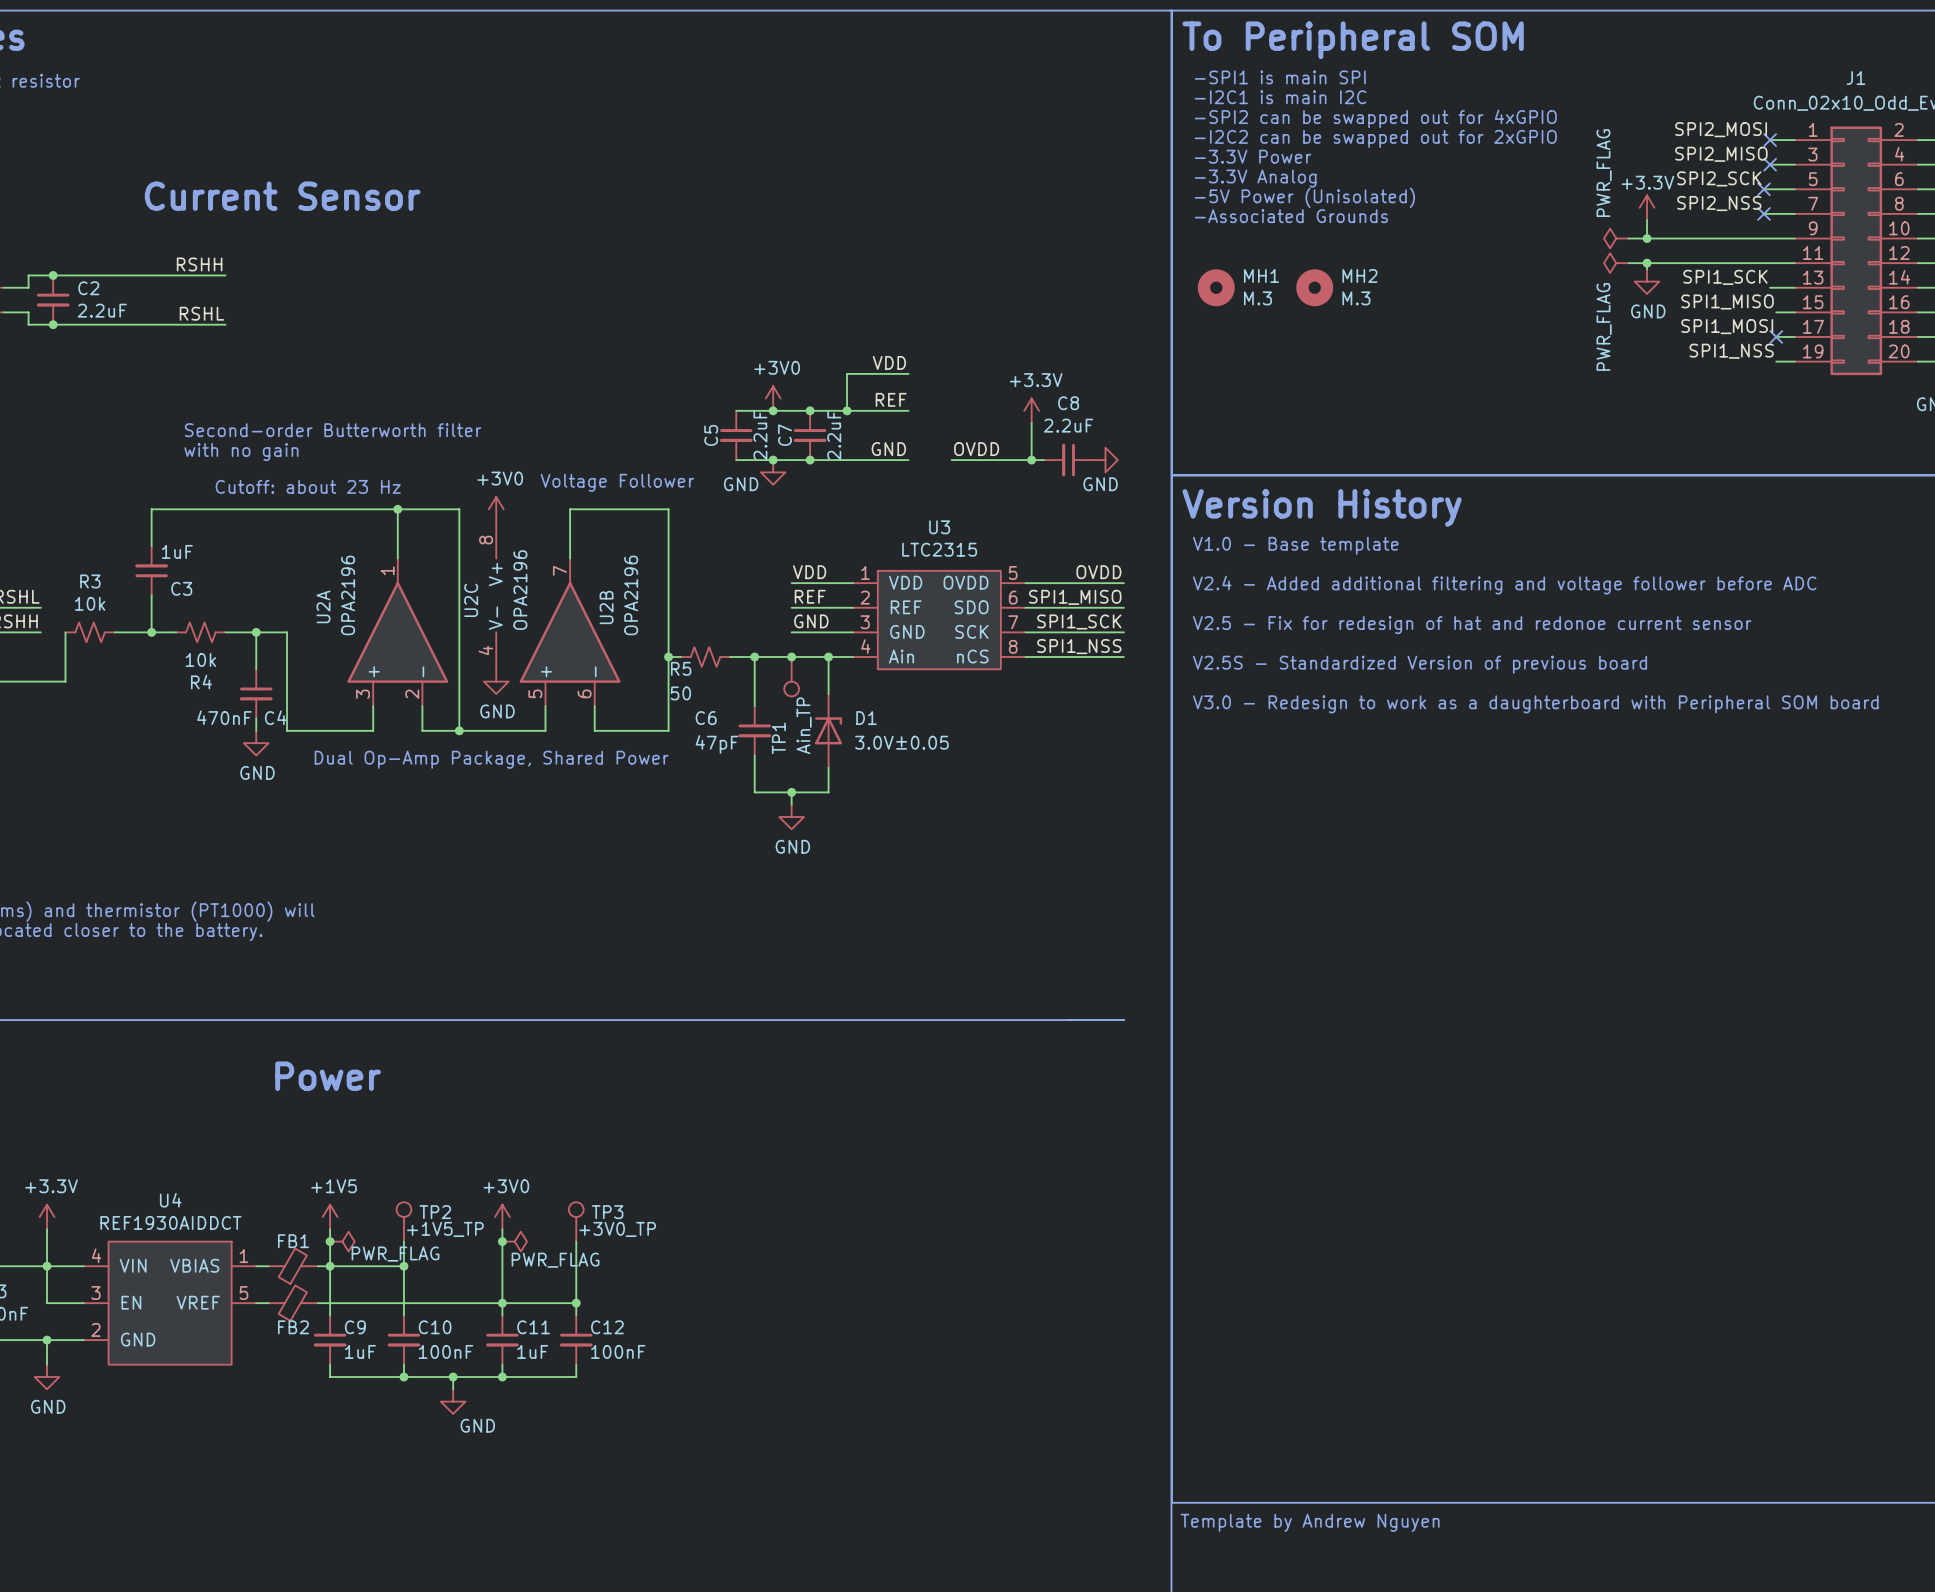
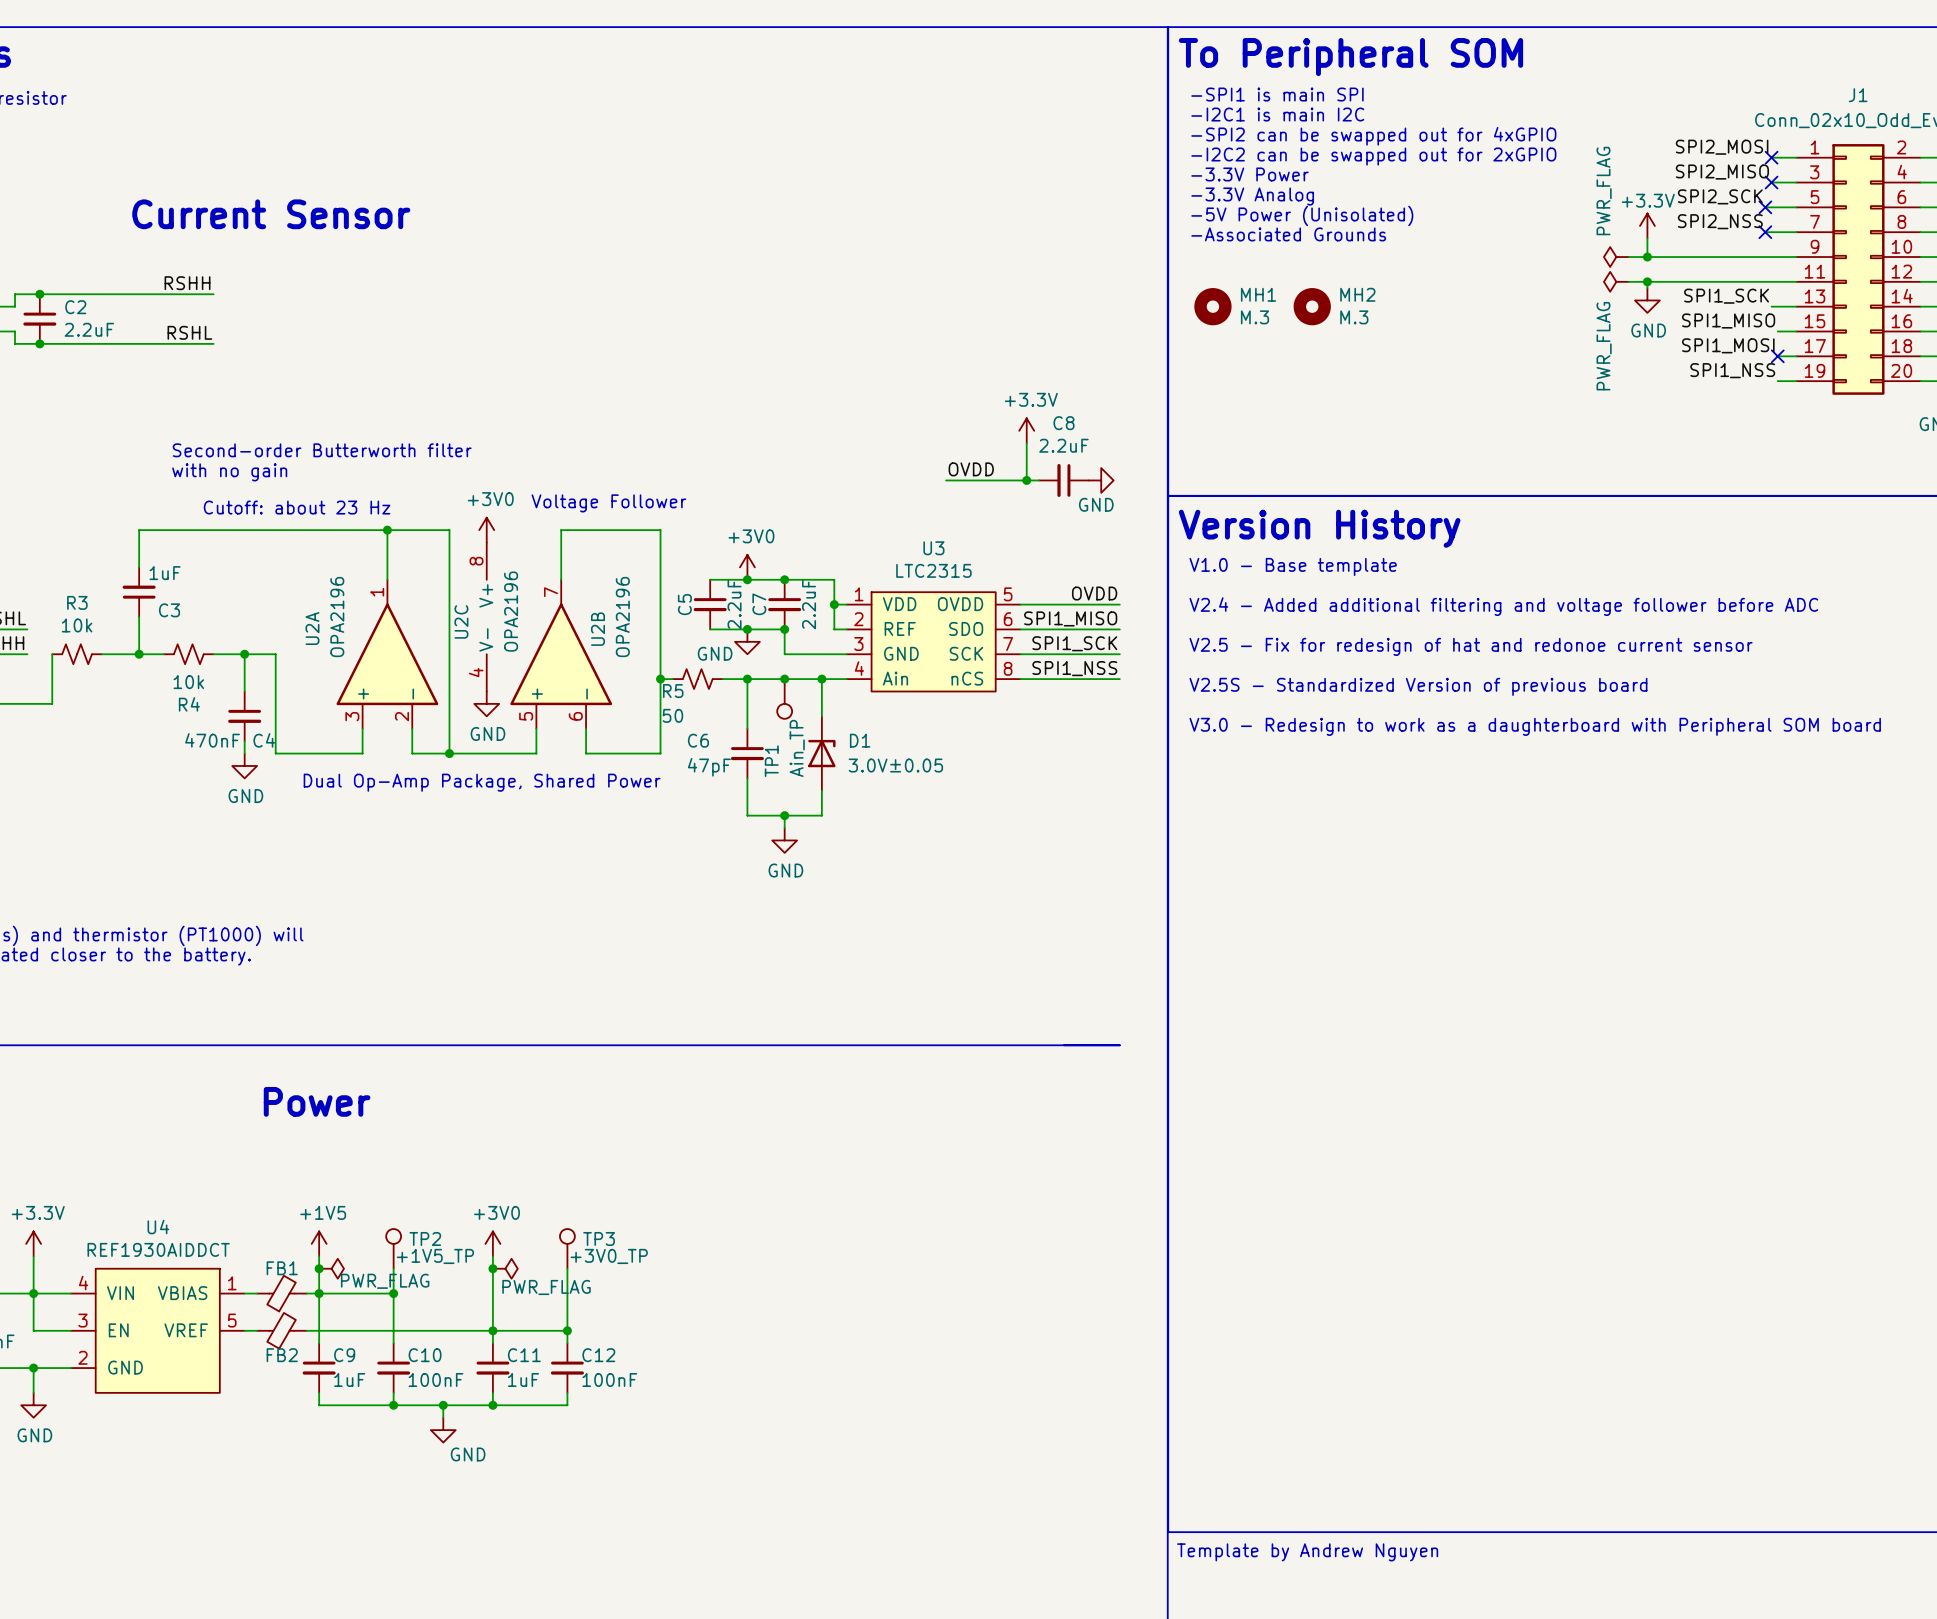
label: VDD (889, 362) -> none
wire: (908, 373) (847, 373) (847, 410) -> none
power symbol position: +3V0 (773, 398) -> +3V0 (747, 567)
label: REF (891, 399) -> none
wire: (736, 410) (908, 410) -> none
junction: (773, 410) -> none
junction: (810, 410) -> none
junction: (847, 410) -> none
C5 position: (736, 435) -> (710, 604)
C7 position: (810, 435) -> (784, 604)
label: GND (888, 449) -> none
wire: (736, 460) (908, 460) -> none
junction: (773, 460) -> none
junction: (810, 460) -> none
power symbol position: GND (773, 472) -> GND (747, 641)
junction: none -> (747, 579)
junction: none -> (784, 579)
label: VDD (809, 572) -> none
wire: (791, 583) (840, 583) -> none
junction: none -> (834, 604)
label: REF (810, 596) -> none
wire: none -> (710, 629) (784, 629) (784, 654)
junction: none -> (747, 629)
wire: (791, 607) (840, 607) -> (710, 579) (834, 579) (834, 629)
junction: none -> (784, 629)
label: GND (811, 621) -> none

